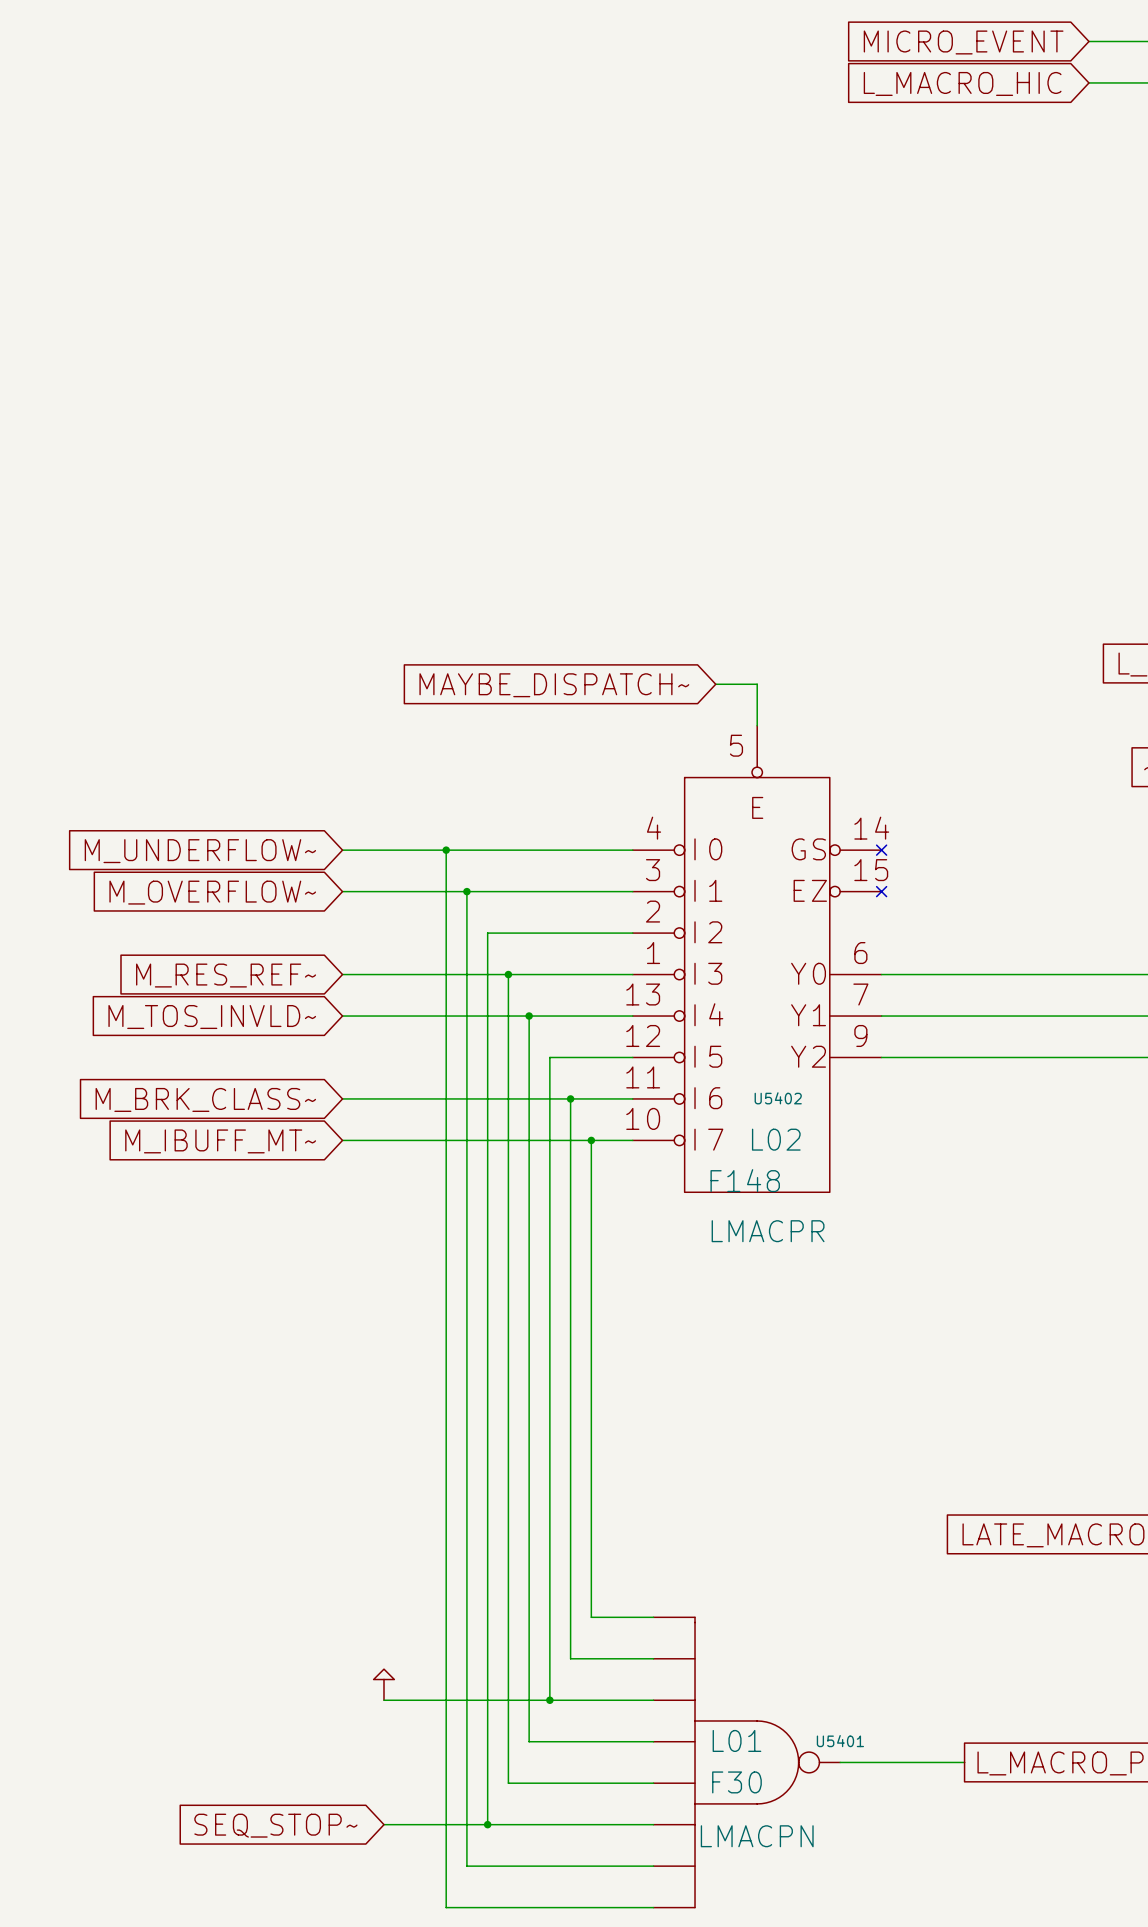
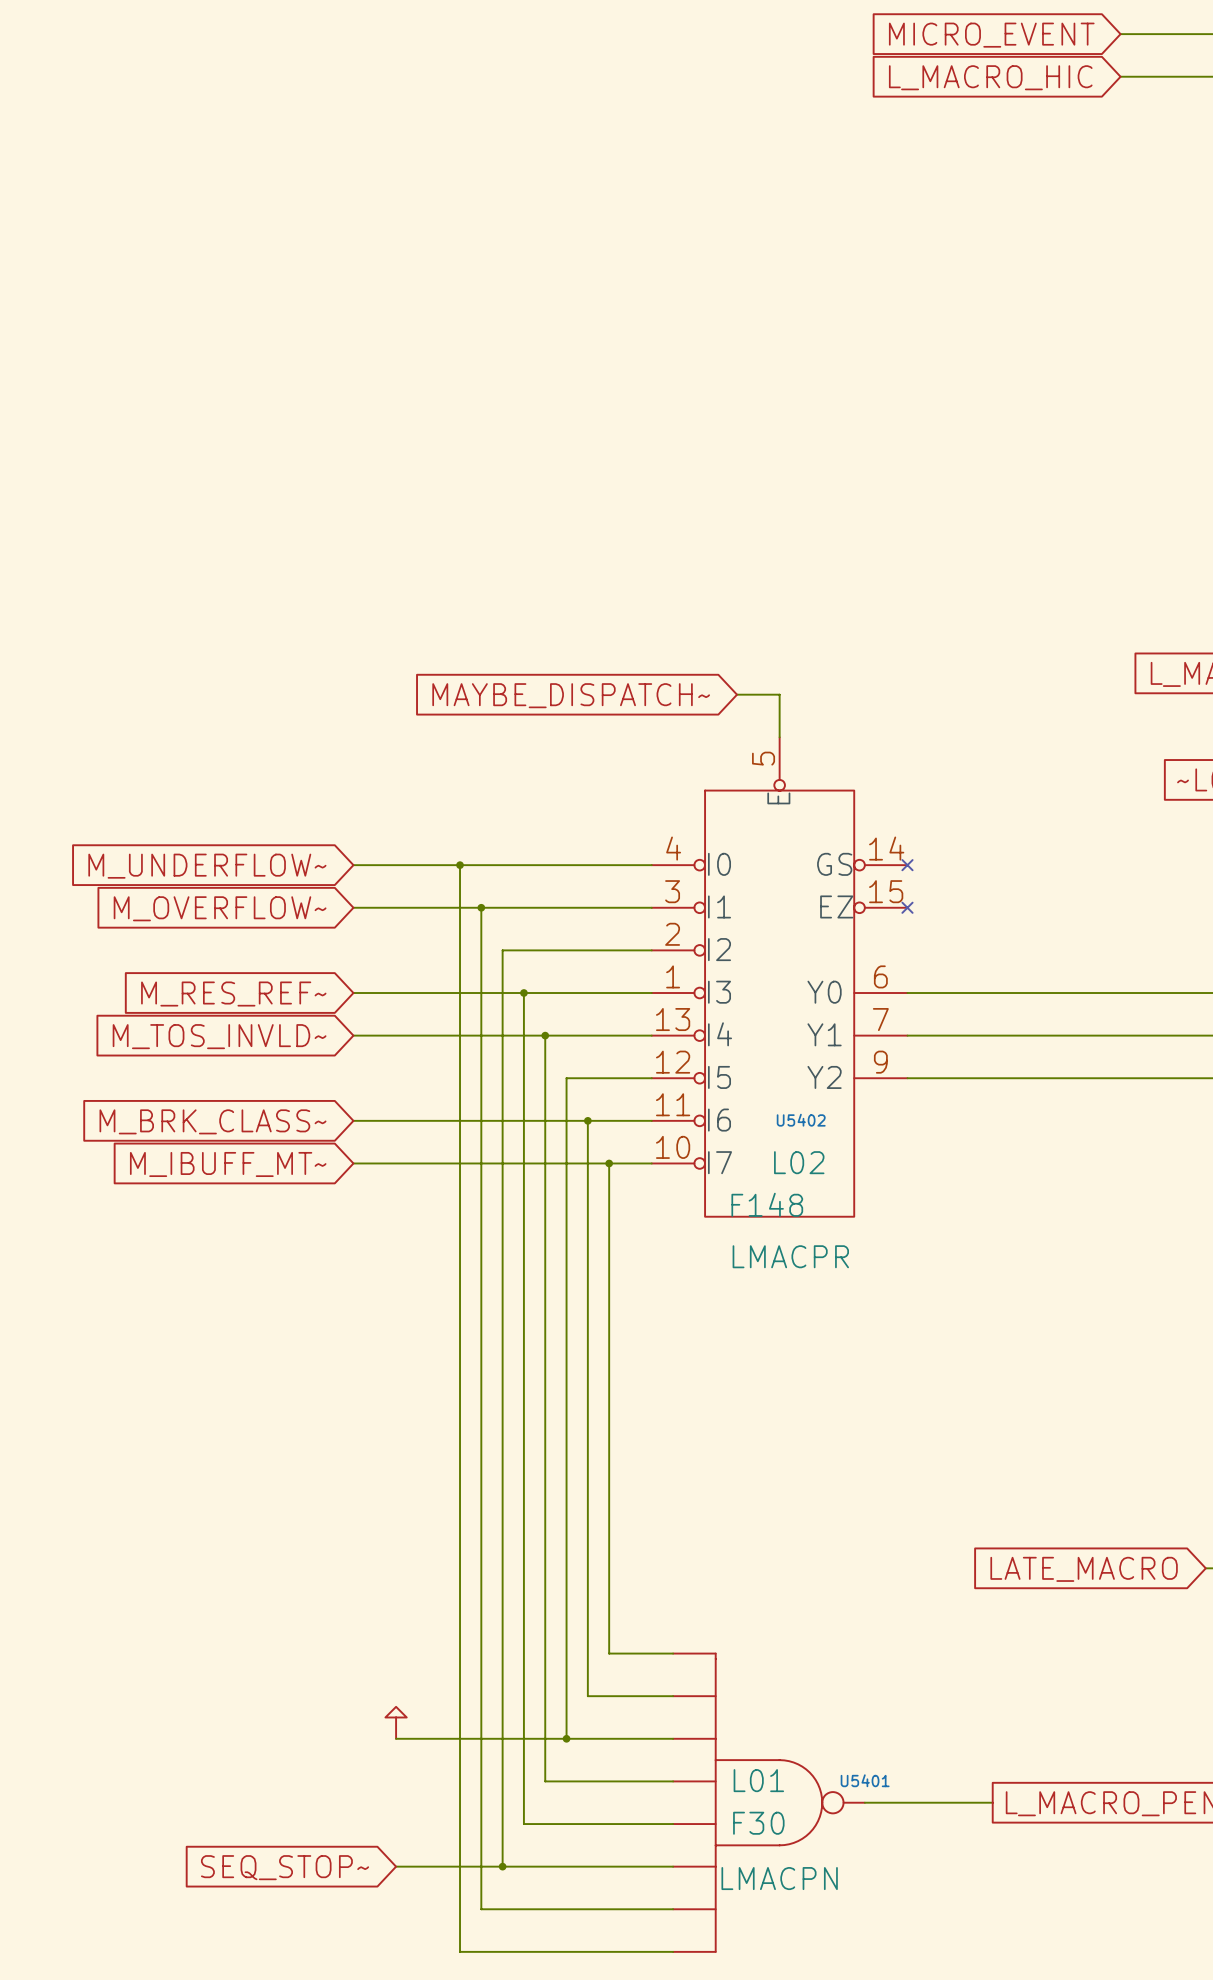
U5402 symbol: [632, 725, 882, 1193] -> [651, 737, 908, 1217]

